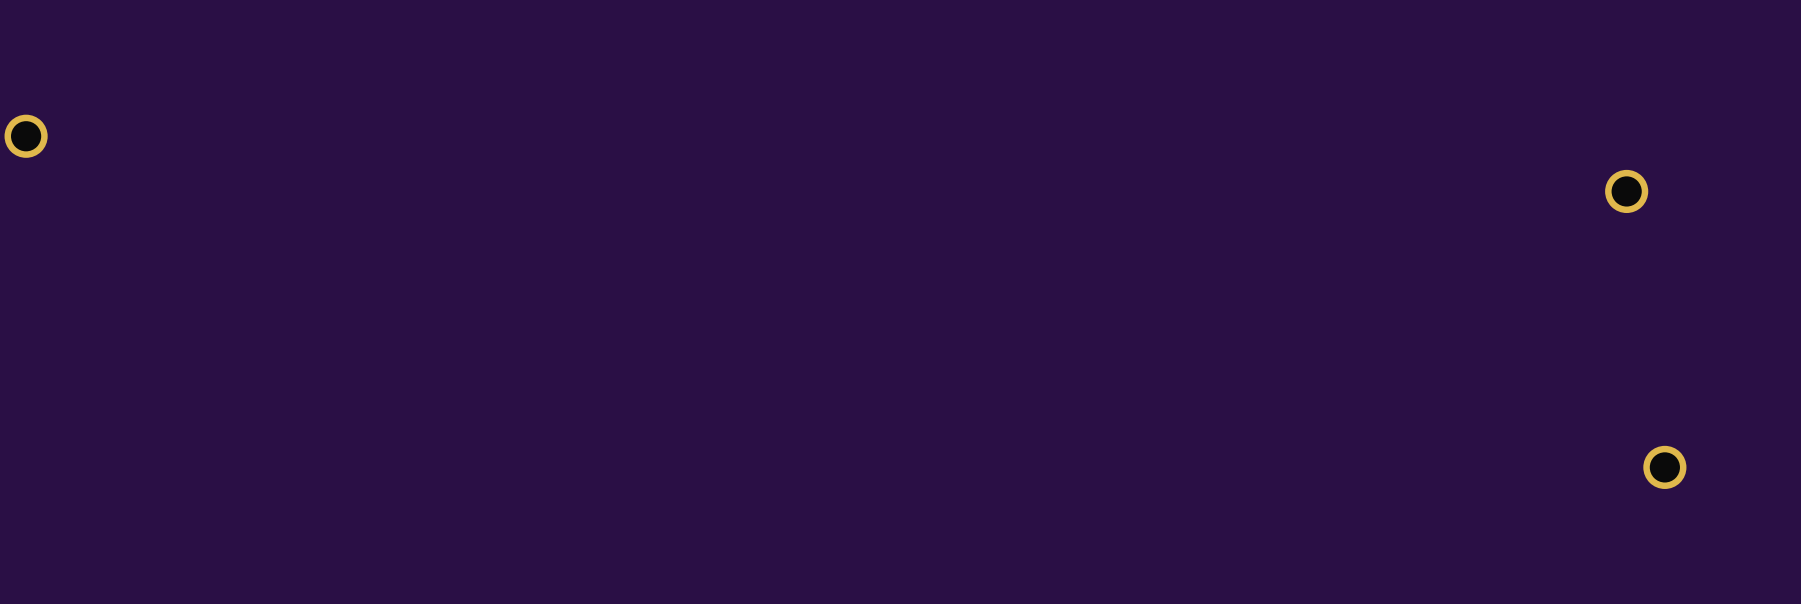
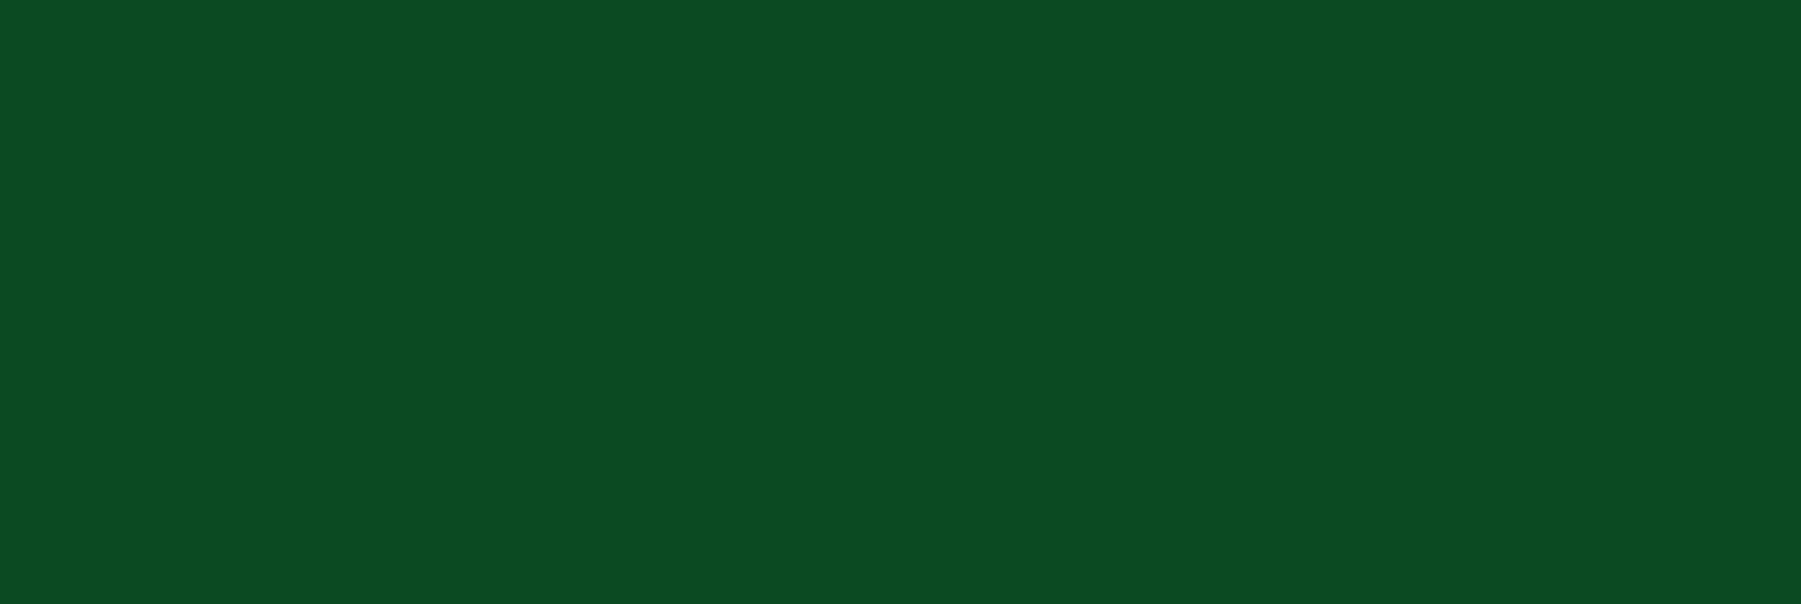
part: (26, 136) -> none
part: (1626, 191) -> none
part: (1664, 467) -> none

